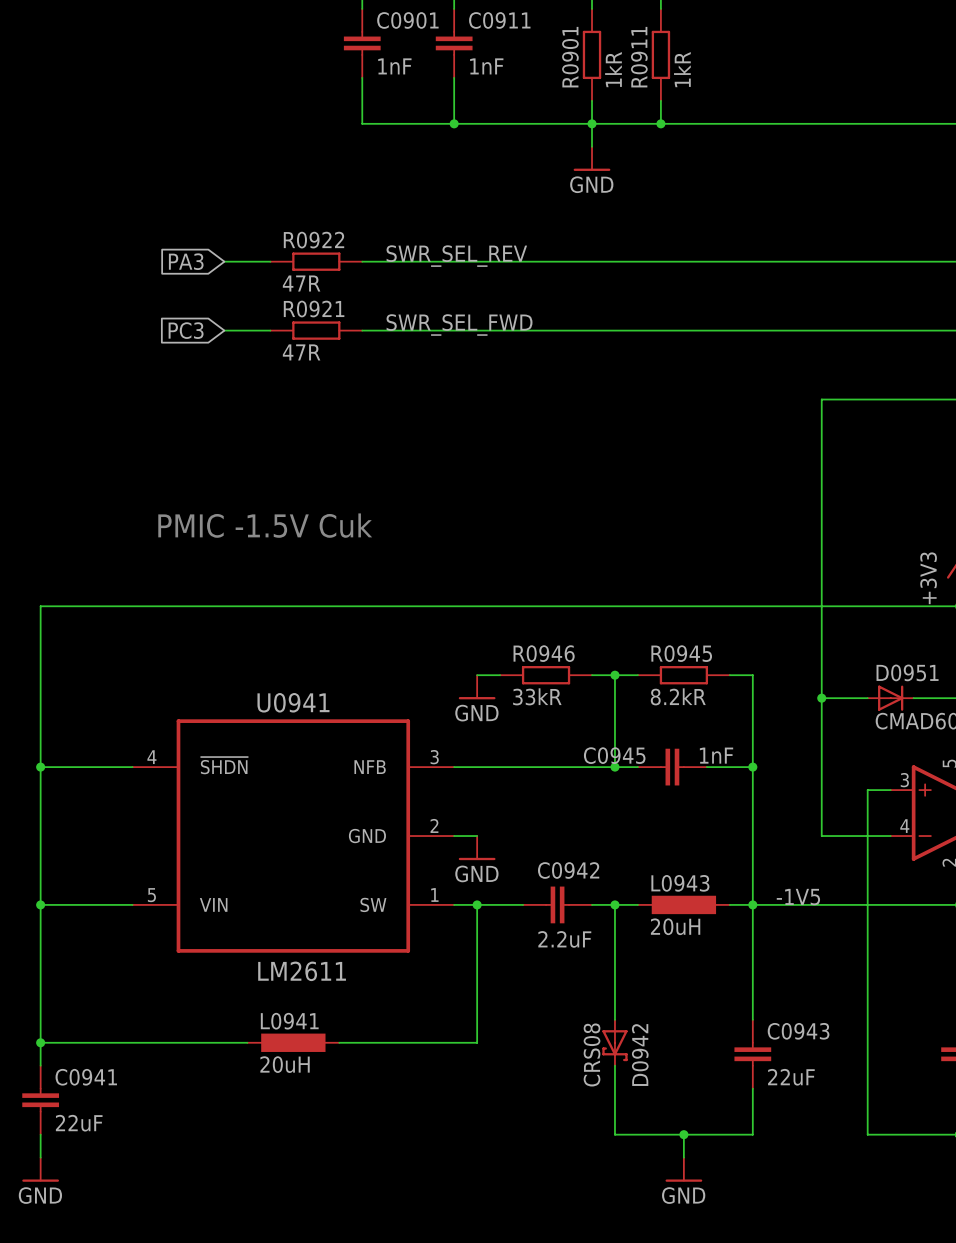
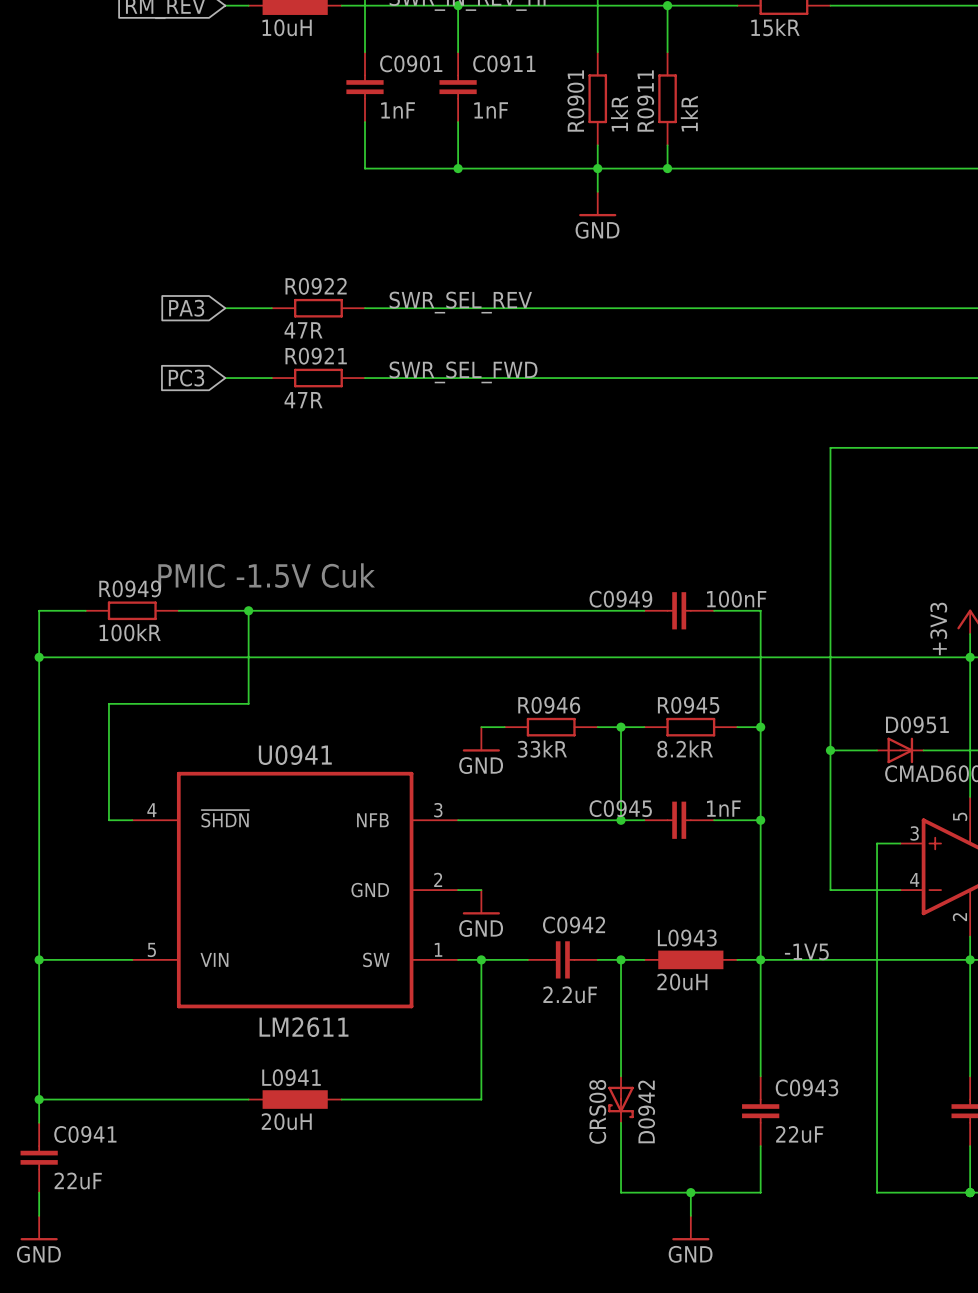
wire: none -> (85, 610) (39, 610) (39, 657)
R0949: none -> 100kR (132, 610)
wire: none -> (178, 610) (644, 610)
junction: none -> (248, 610)
C0949: none -> 100nF (679, 610)
wire: none -> (714, 610) (760, 610) (760, 727)
junction: none -> (39, 657)
junction: none -> (760, 727)
wire: (40, 767) (109, 767) -> (248, 610) (248, 703) (108, 703) (108, 820)
junction: (40, 767) -> none

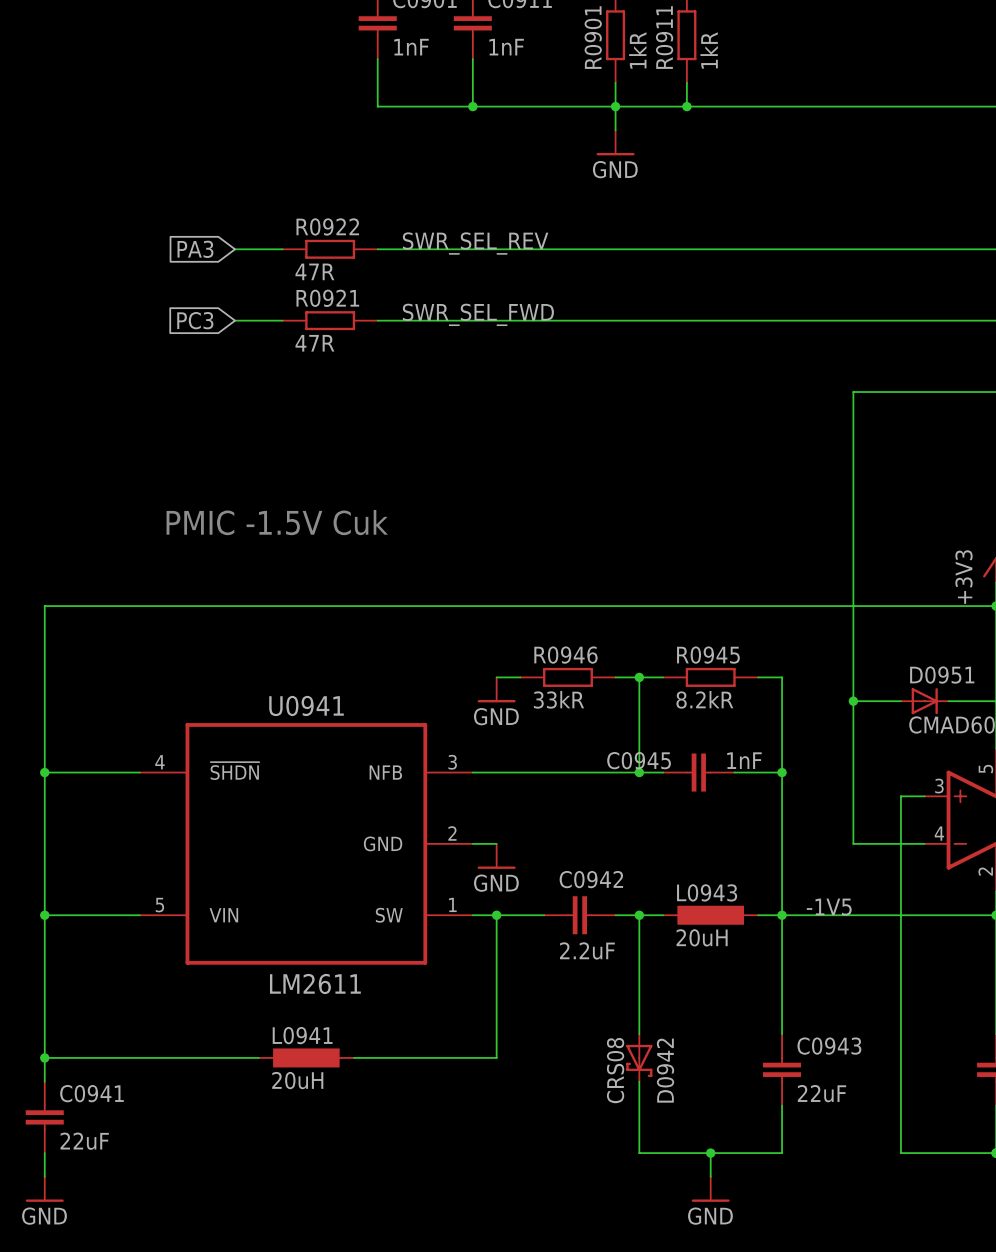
wire: (85, 610) (39, 610) (39, 657) -> none
R0949: 100kR (132, 610) -> none
wire: (178, 610) (644, 610) -> none
wire: (248, 610) (248, 703) (108, 703) (108, 820) -> (44, 772) (116, 772)
junction: (248, 610) -> none
C0949: 100nF (679, 610) -> none
wire: (714, 610) (760, 610) (760, 727) -> none
junction: (39, 657) -> none
junction: (760, 727) -> none
junction: none -> (44, 772)

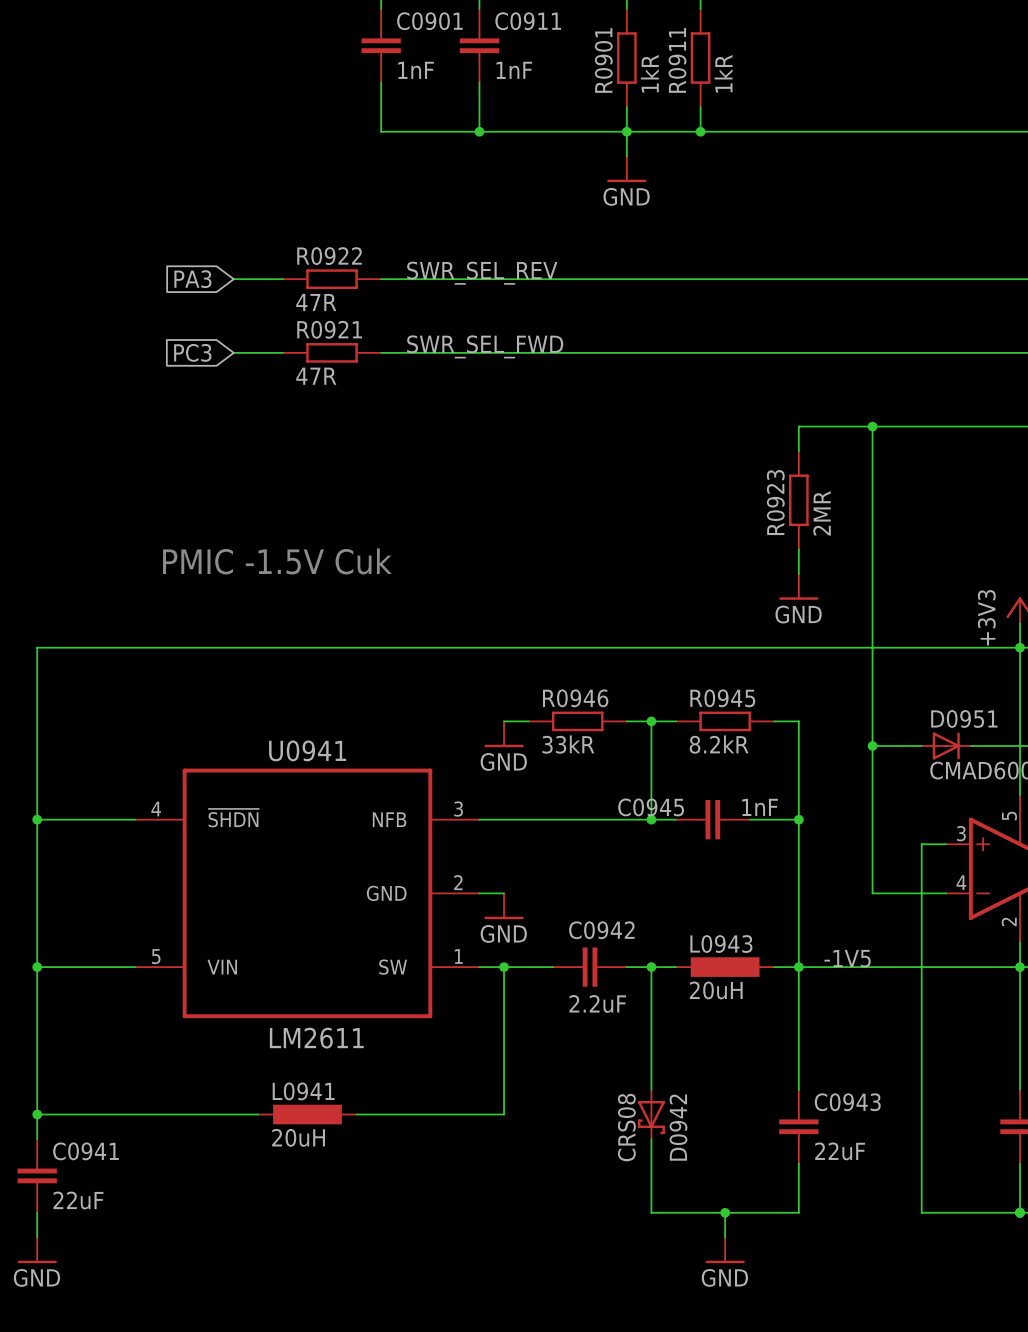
wire: none -> (872, 426) (798, 426) (798, 451)
junction: none -> (872, 426)
R0923: none -> 2MR (798, 500)
wire: none -> (798, 549) (798, 573)
power symbol: none -> GND (798, 586)

